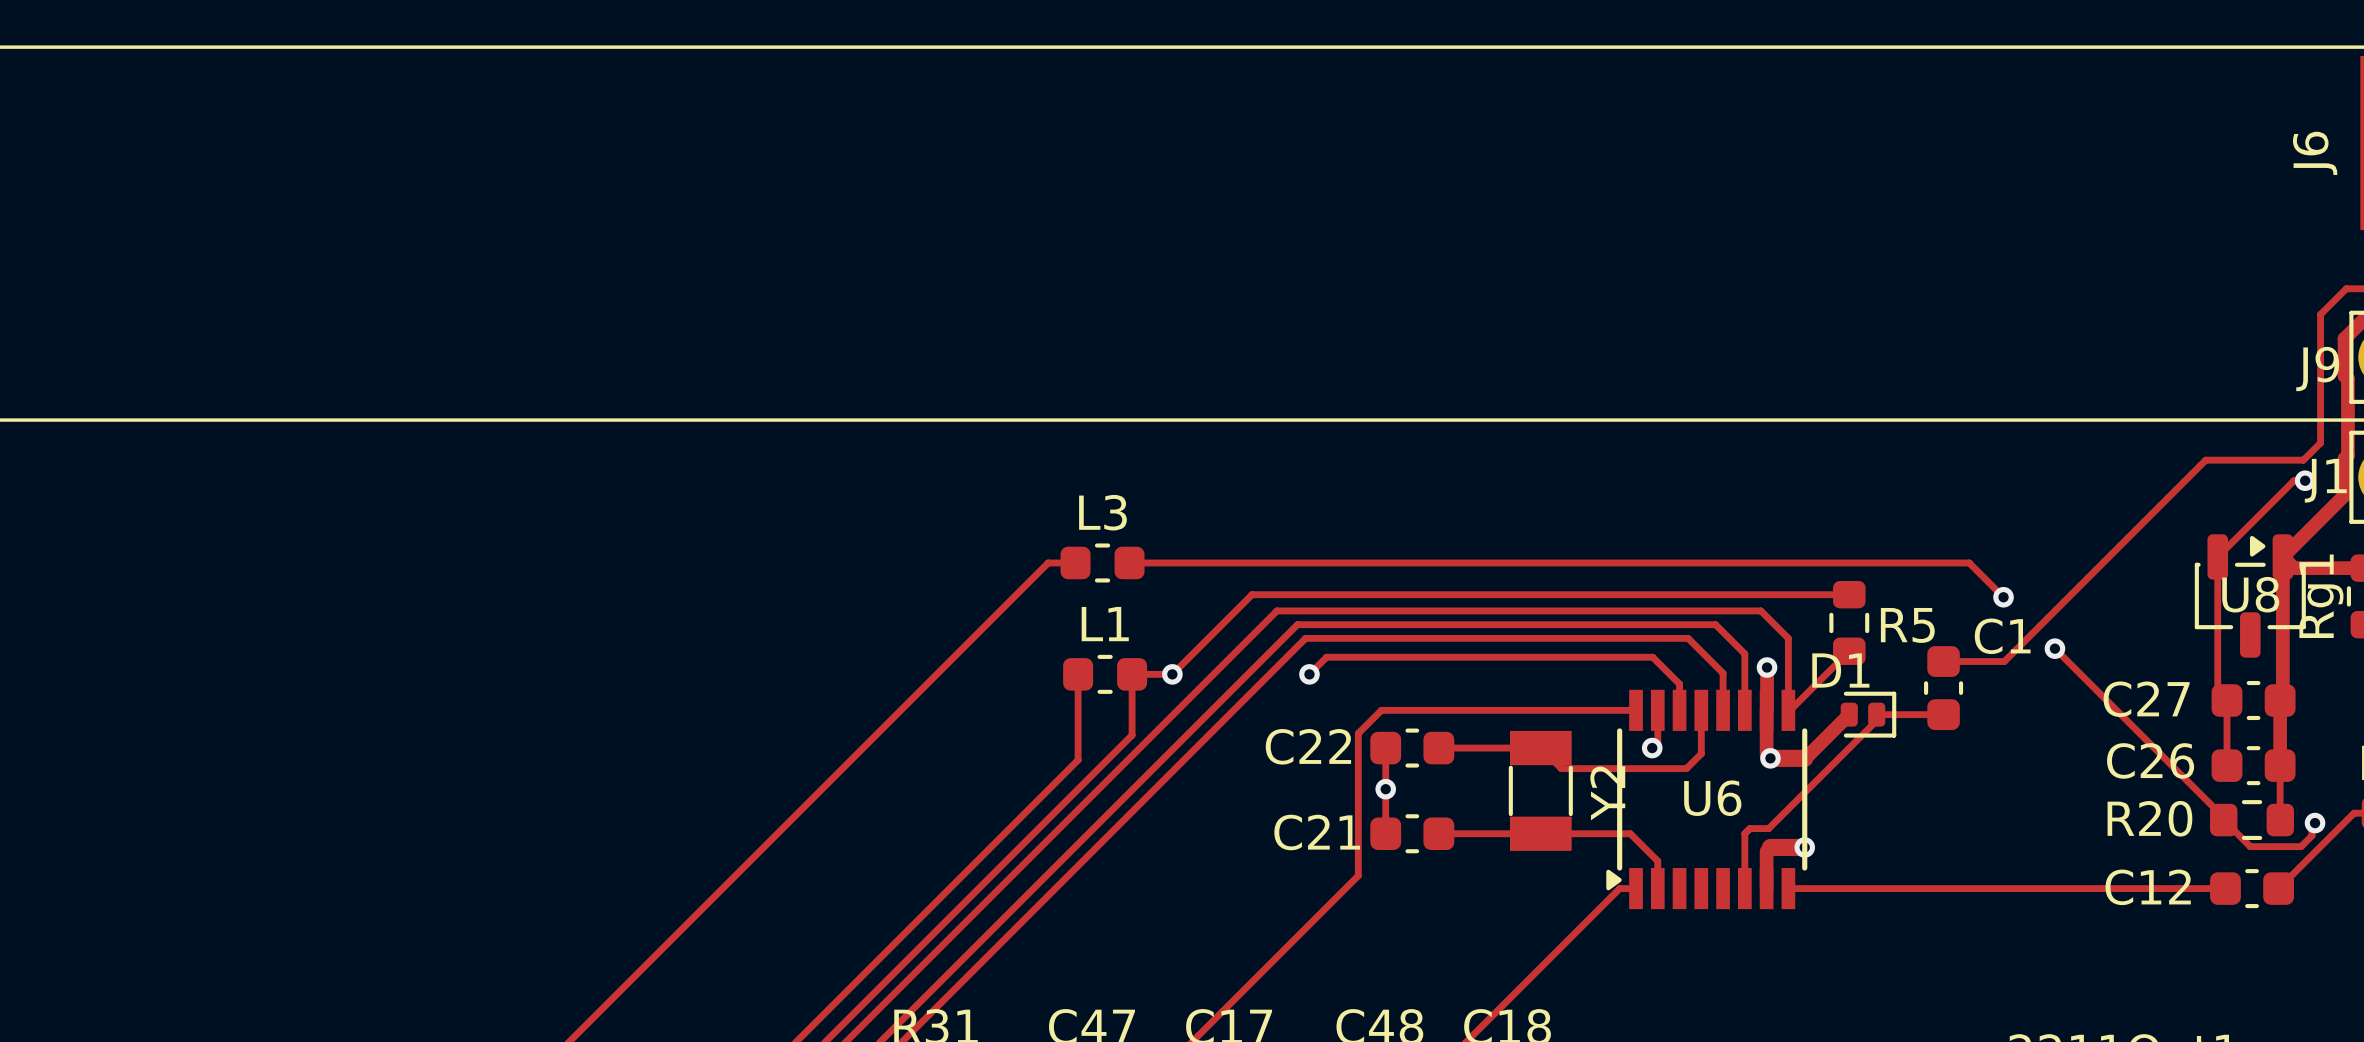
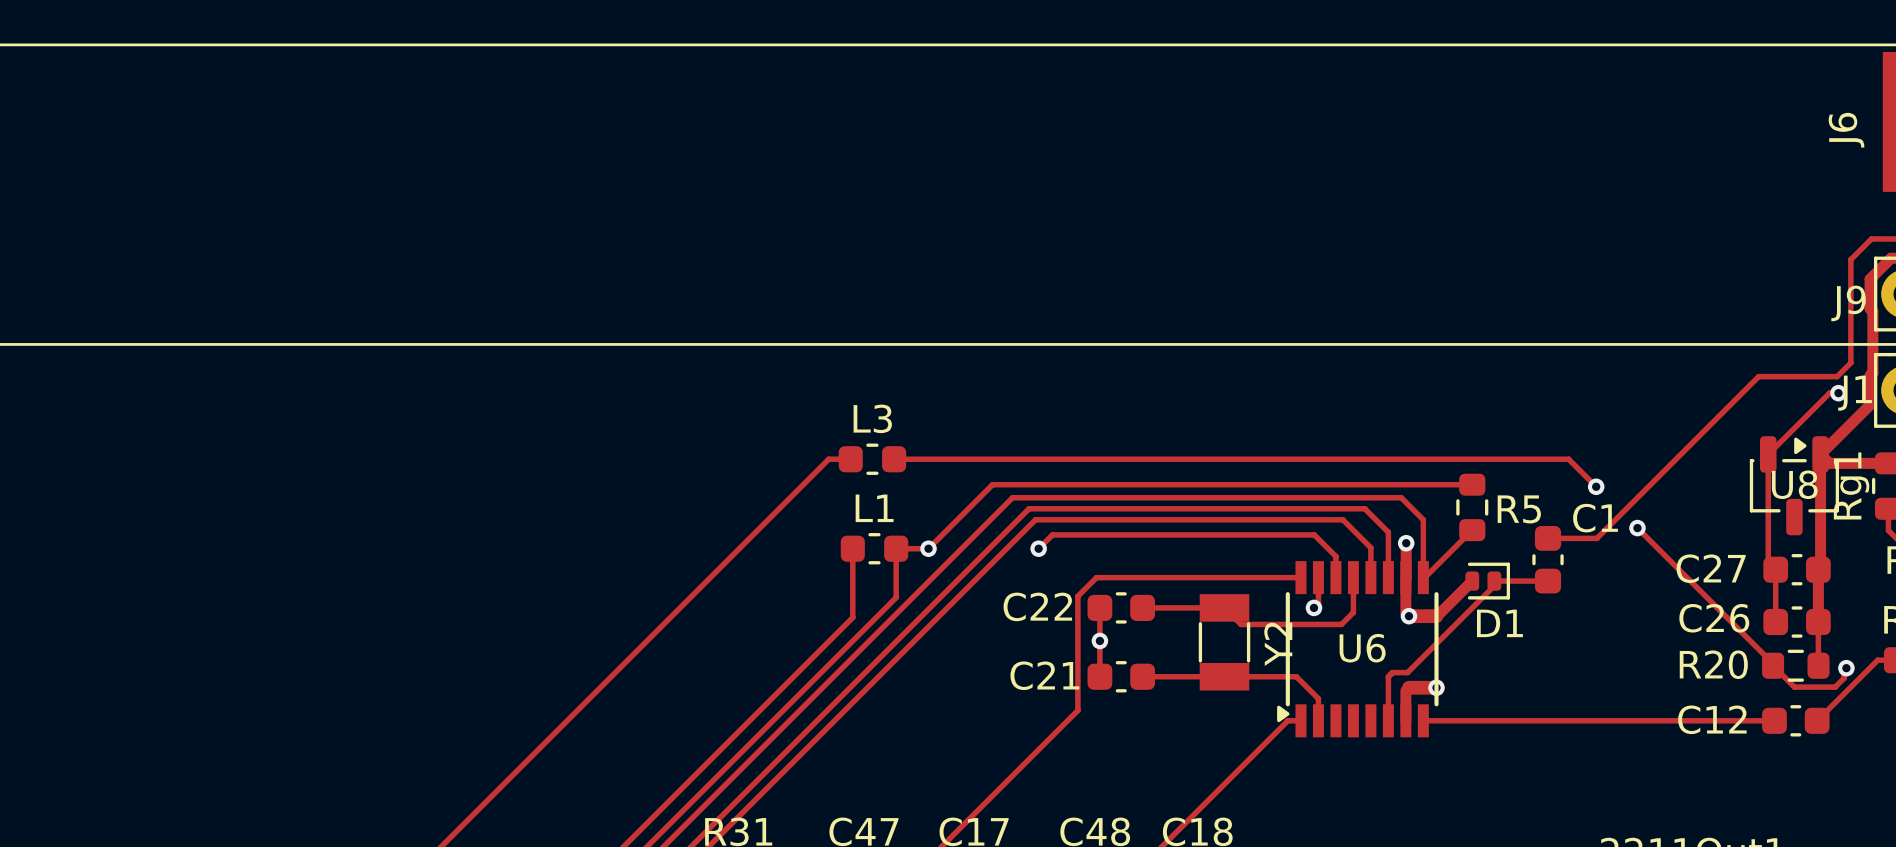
D1 name position: D1 (1840, 670) -> D1 (1499, 623)

